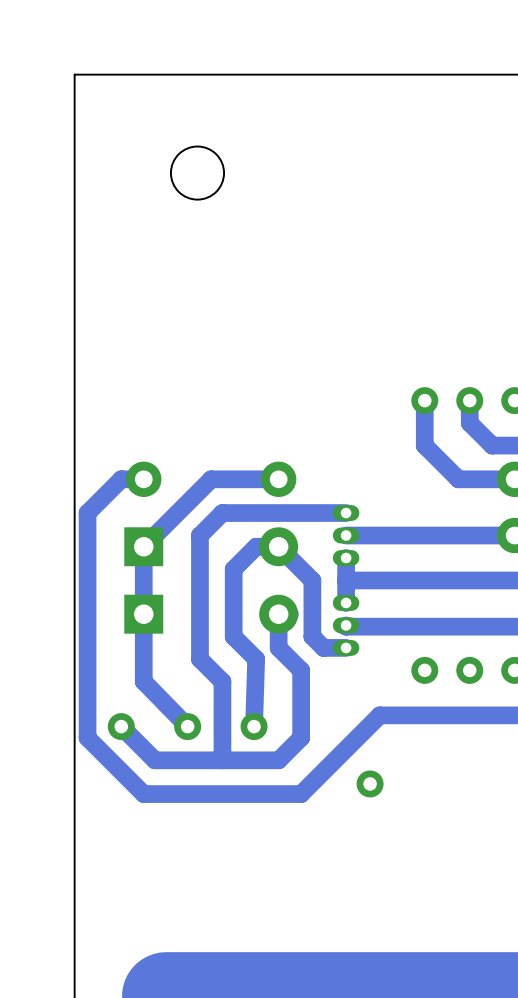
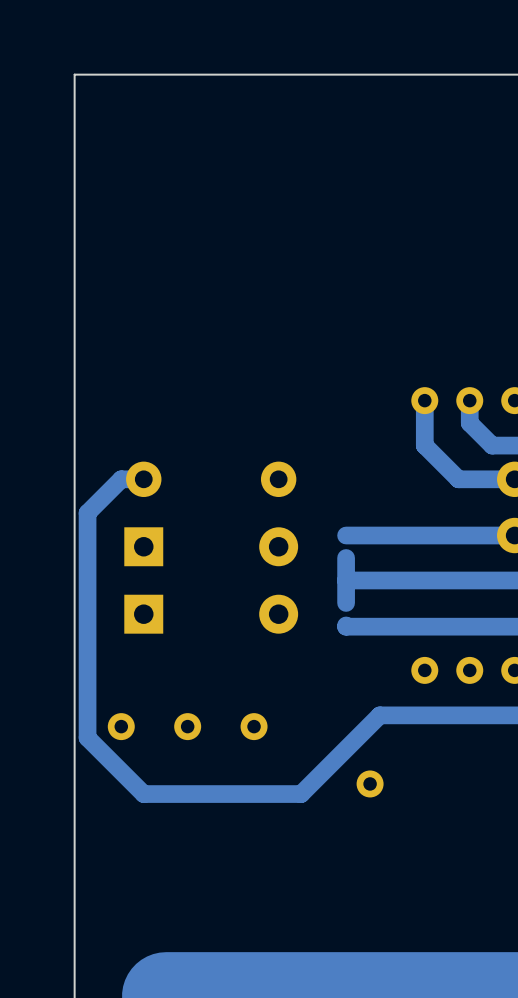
round board edge: [170, 145, 225, 201] -> none
track: (278, 479) (211, 479) (143, 546) (143, 681) (187, 726) -> none
track: (346, 513) (222, 513) (199, 535) (199, 659) (222, 681) (222, 760) -> none
part: (346, 535) -> none
track: (289, 614) (278, 614) (278, 647) (301, 670) (301, 737) (278, 760) (155, 760) (121, 726) -> none
part: (346, 625) -> none
track: (346, 647) (323, 647) (312, 636) (312, 580) (278, 546) (256, 546) (233, 569) (233, 636) (256, 659) (254, 726) (256, 724) -> none

